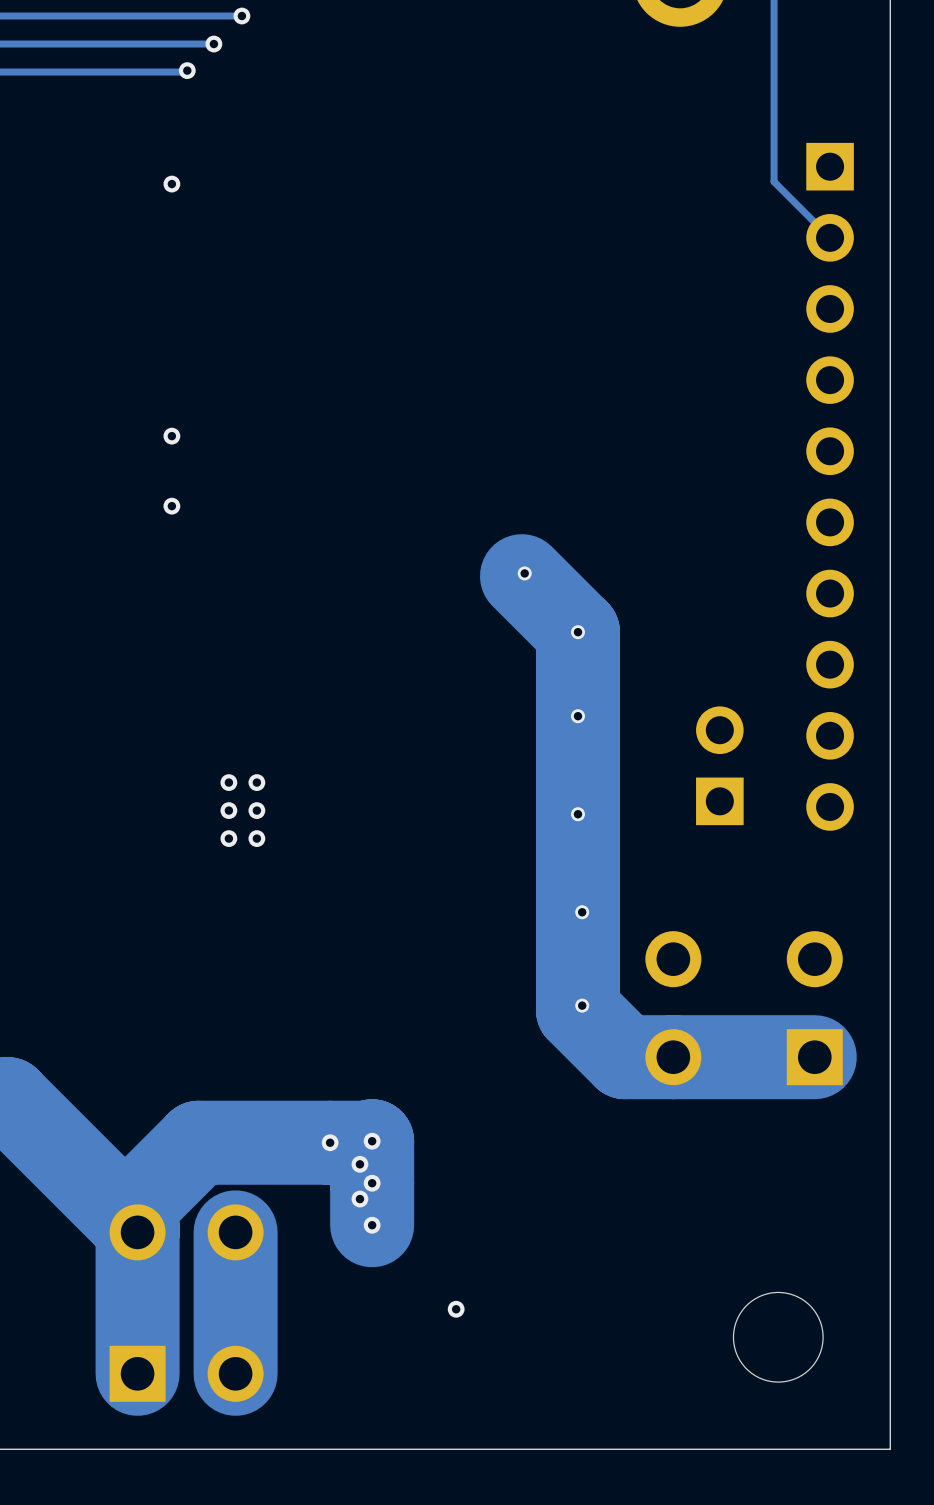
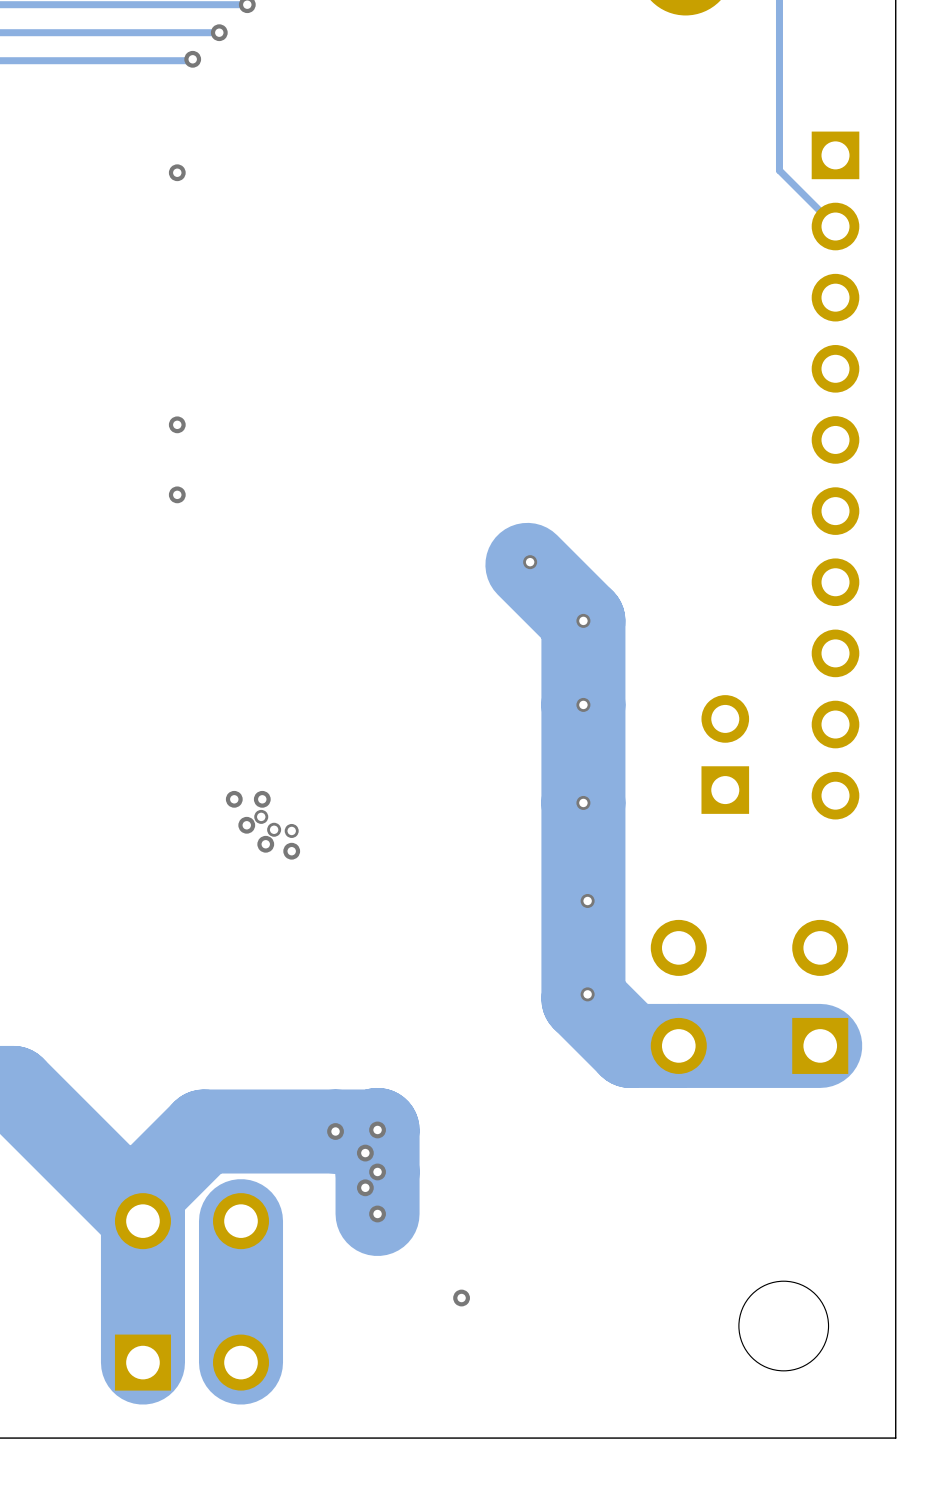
via: (228, 782) -> none
via: (256, 782) -> none
via: none -> (261, 816)
via: none -> (246, 825)
via: (228, 838) -> none
via: (256, 838) -> none
via: none -> (274, 829)
via: none -> (291, 830)
via: none -> (265, 844)
via: none -> (291, 851)

